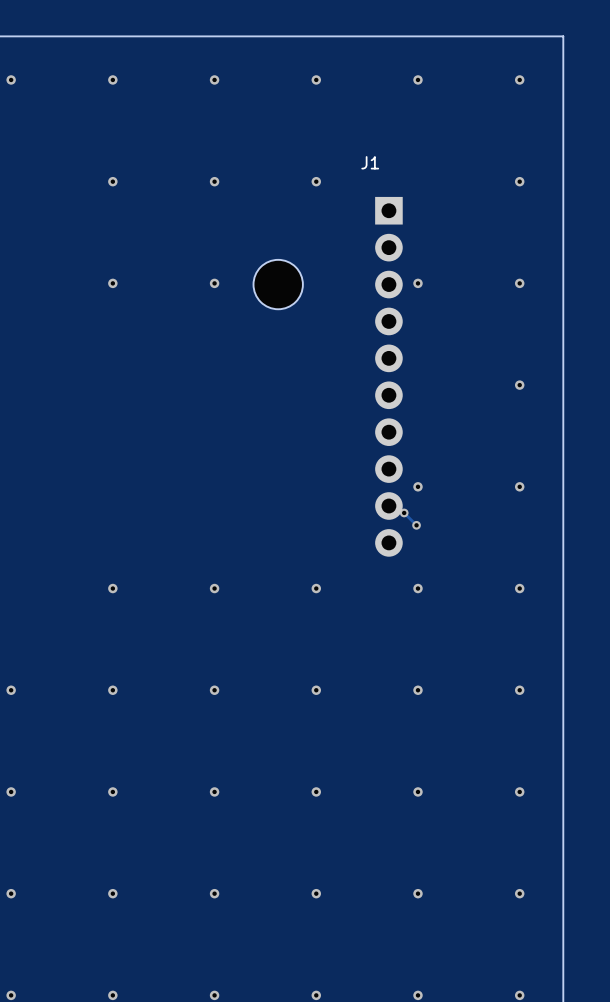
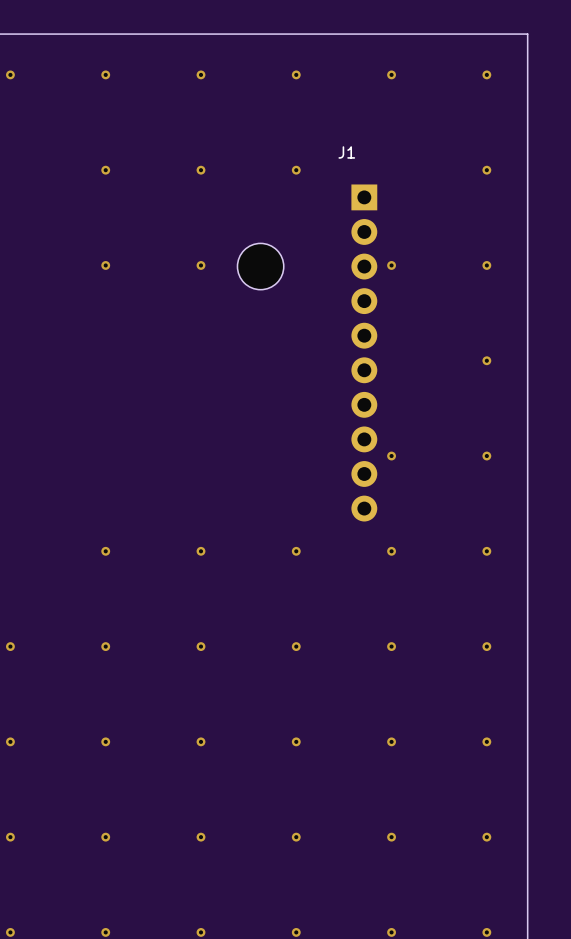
track: (404, 512) (416, 525) -> none
via: (404, 512) -> none
via: (416, 525) -> none

